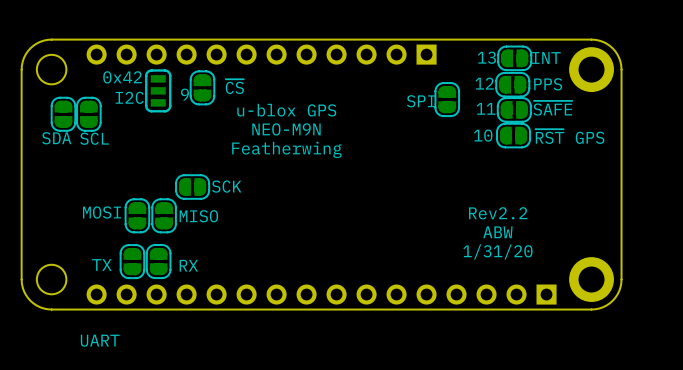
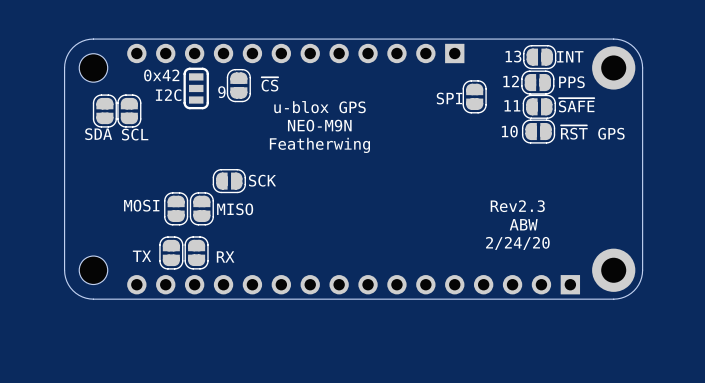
text: Rev2.2 (498, 213) -> Rev2.3 (517, 206)
text: 1/31/20 (497, 251) -> 2/24/20 (517, 243)
text: UART (100, 340) -> none

